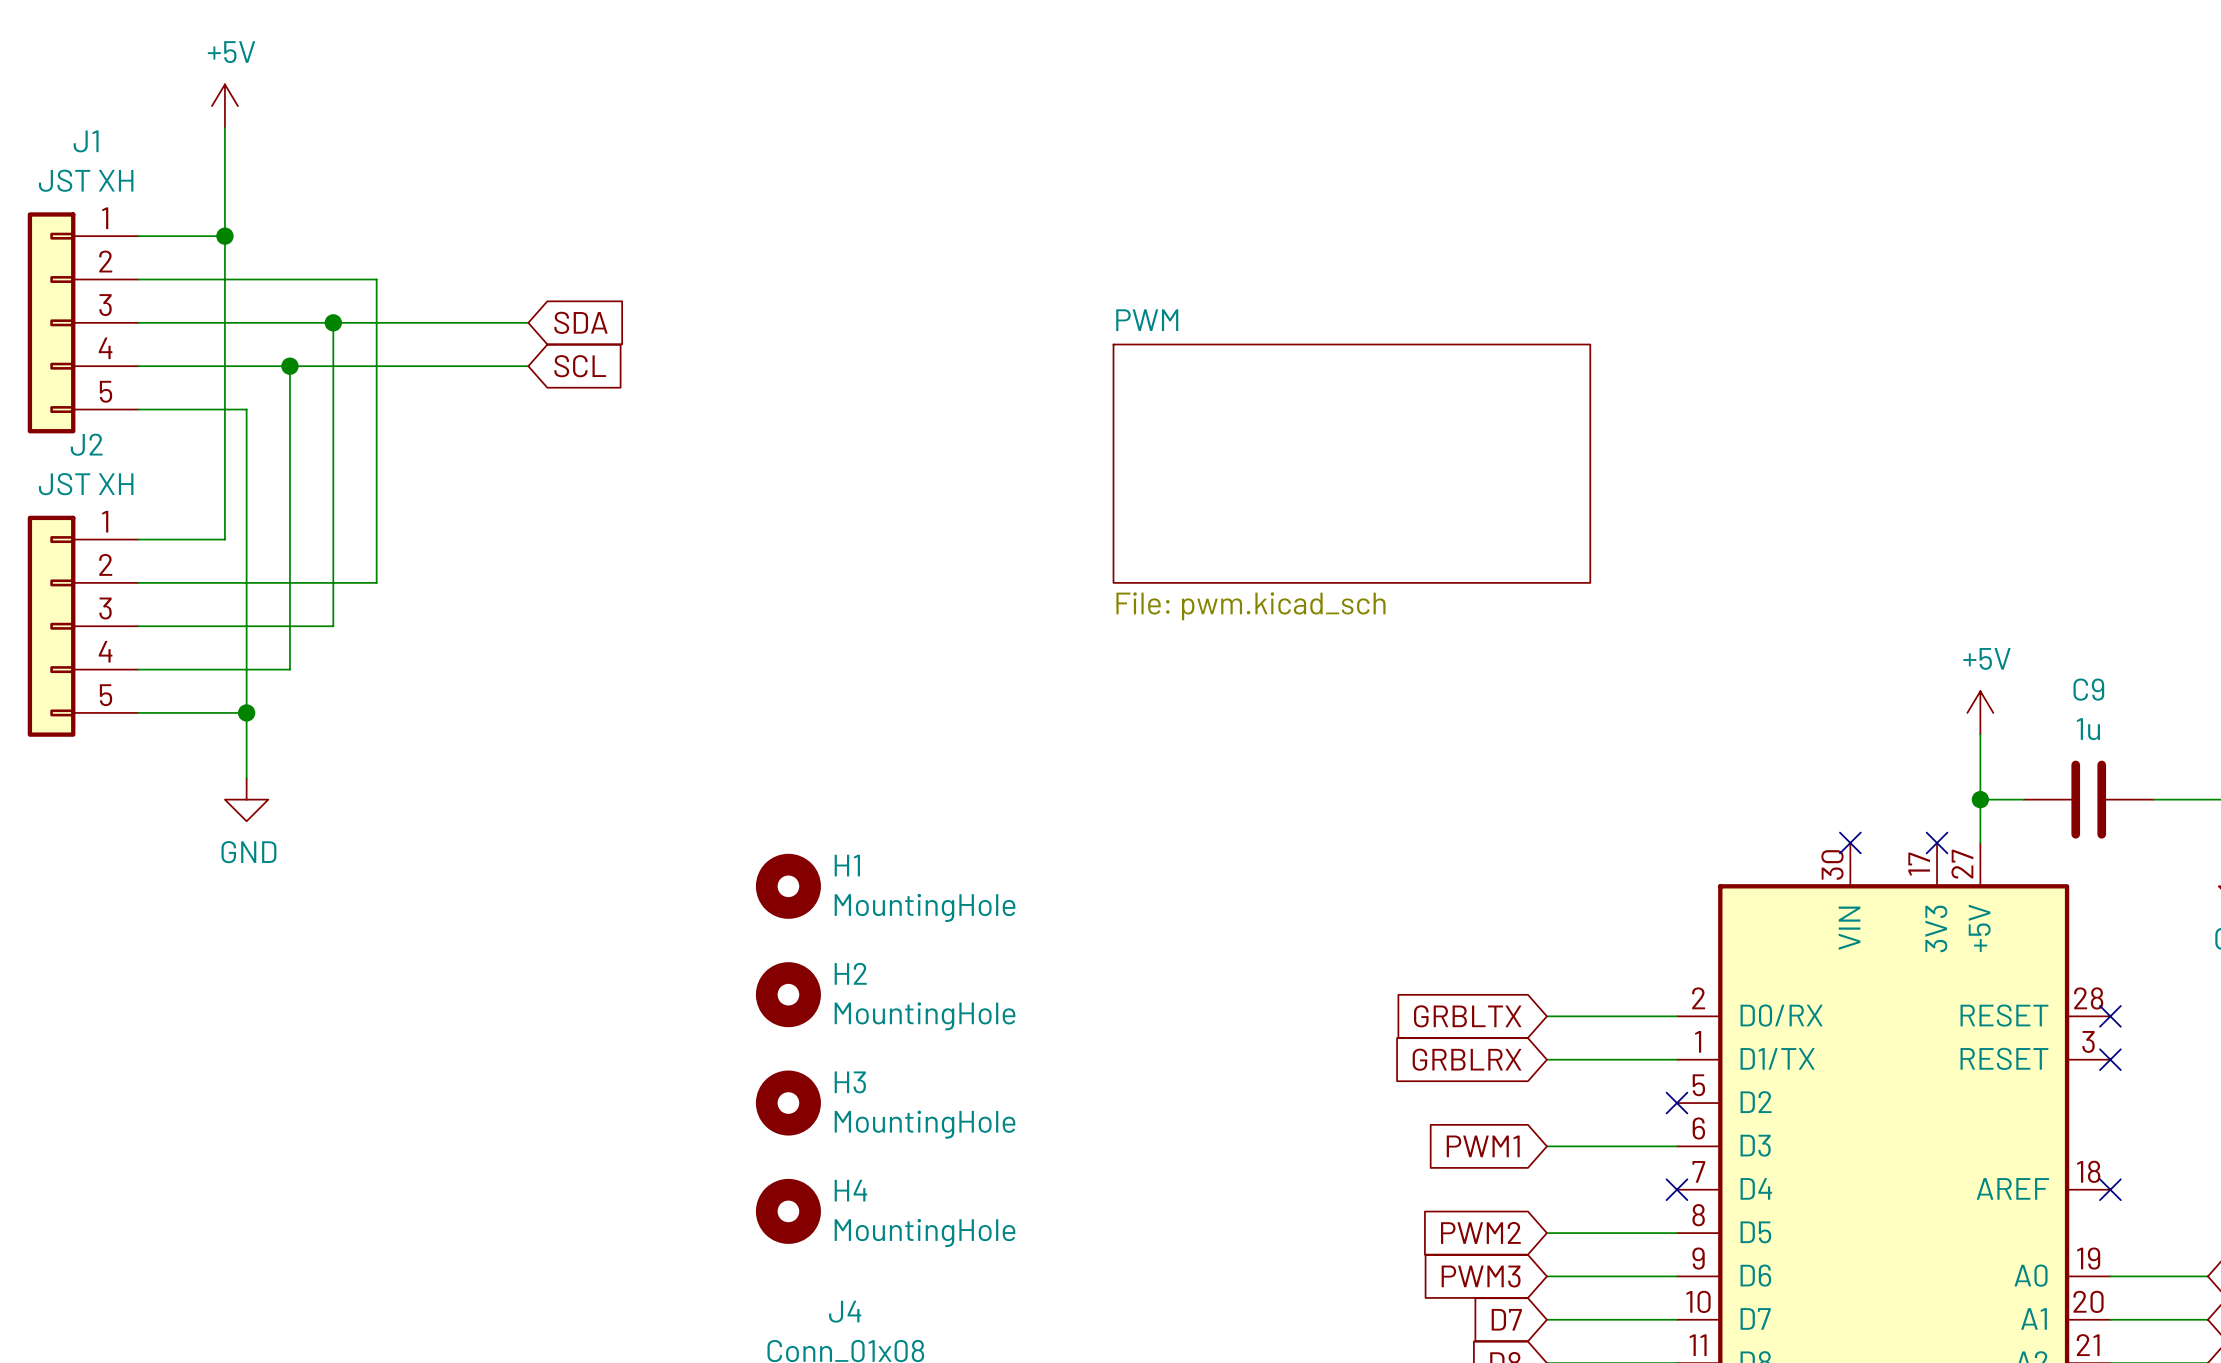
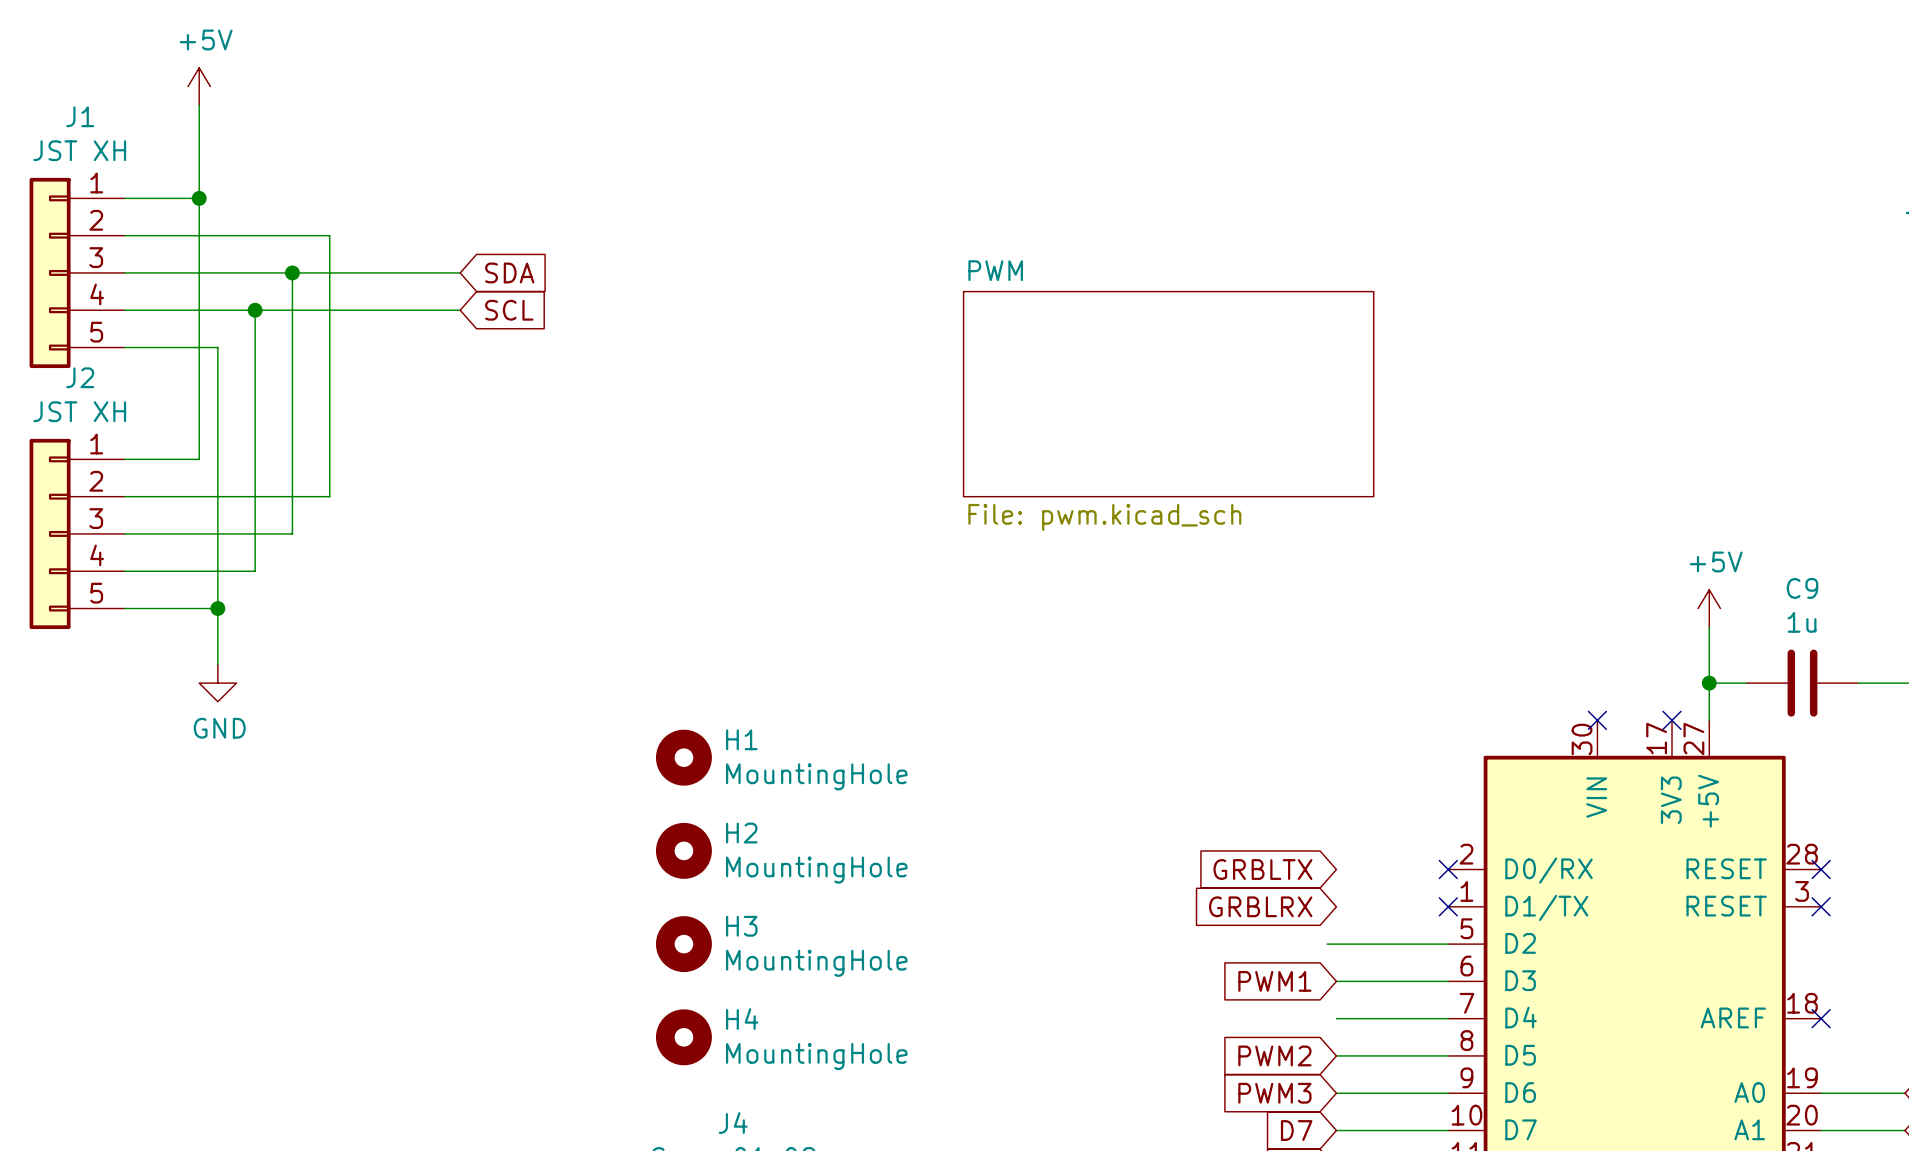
wire: (1546, 1016) (1676, 1016) -> none
no-connect mark: none -> (1448, 869)
wire: (1546, 1059) (1676, 1059) -> (1336, 1018) (1448, 1018)
no-connect mark: none -> (1448, 906)
wire: none -> (1327, 944) (1448, 944)
no-connect mark: (1676, 1103) -> none
no-connect mark: (1676, 1189) -> none

